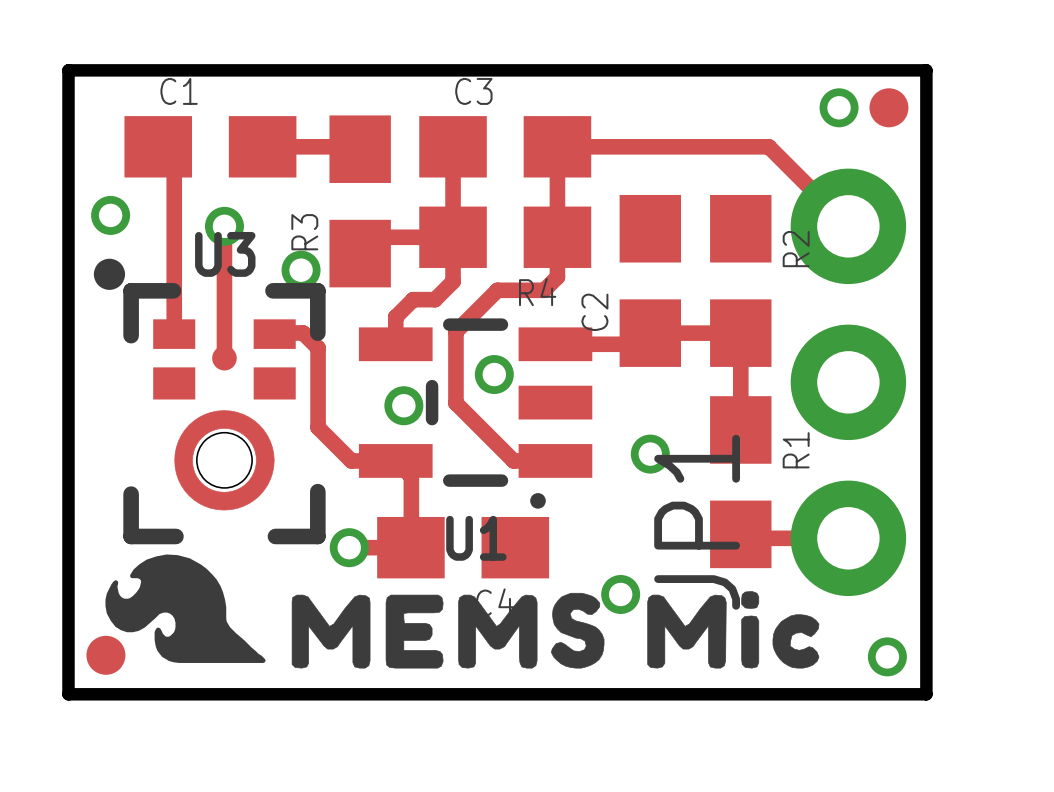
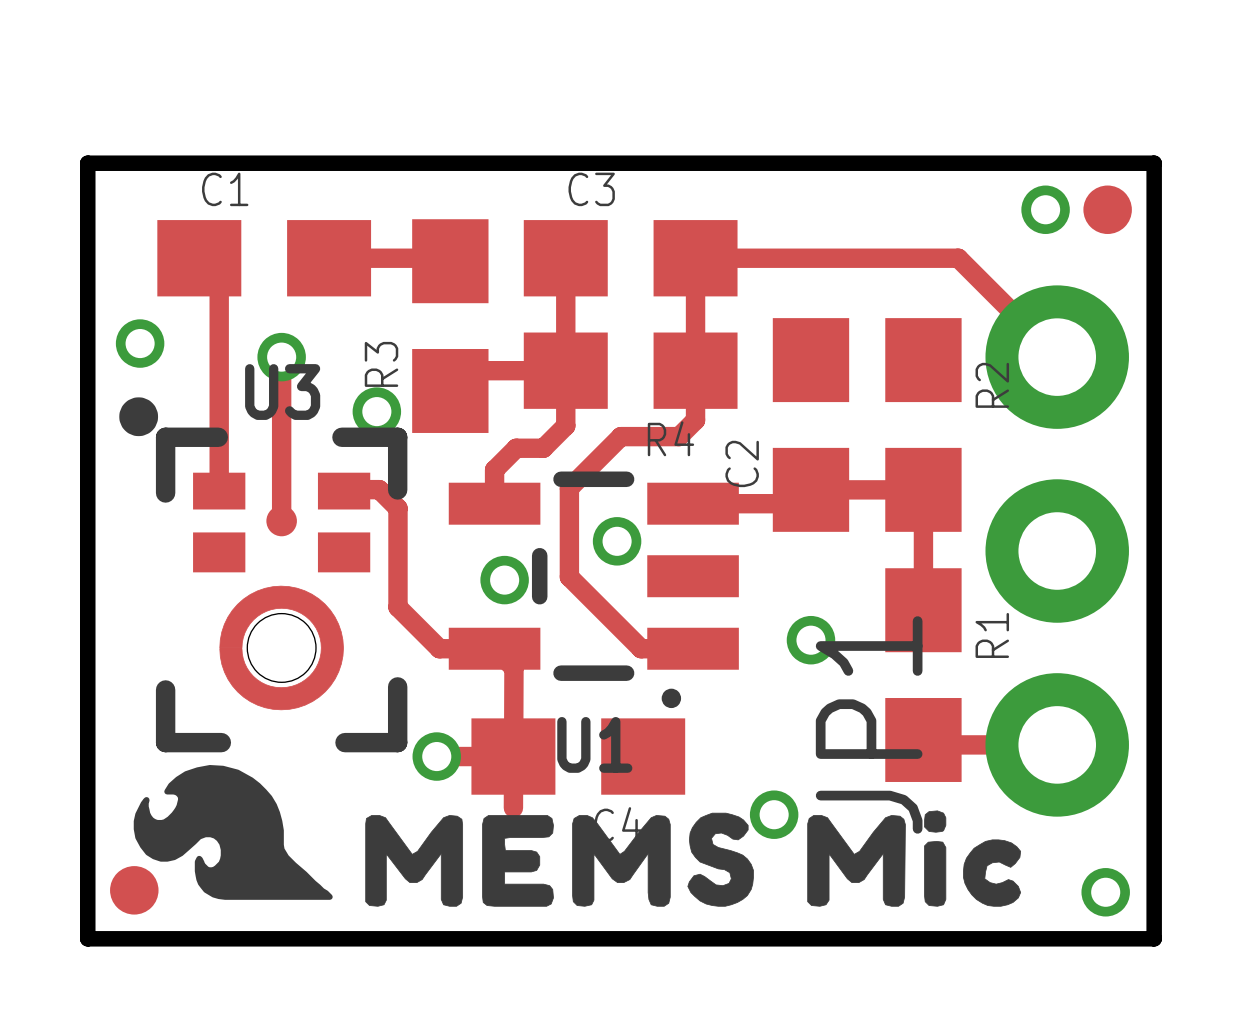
track: (411, 476) (411, 547) -> (513, 668) (513, 807)

